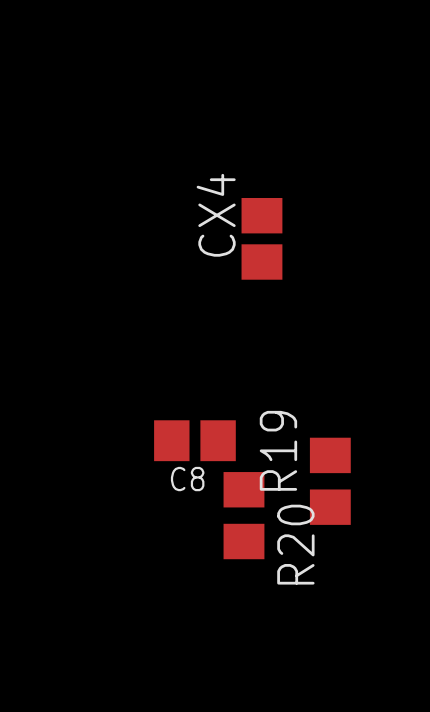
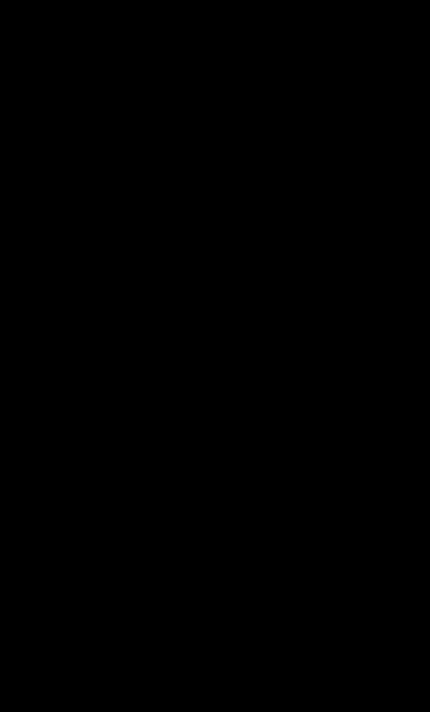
CX4: (261, 238) -> none
C8: (194, 440) -> none
R19: (330, 481) -> none
R20: (243, 515) -> none

